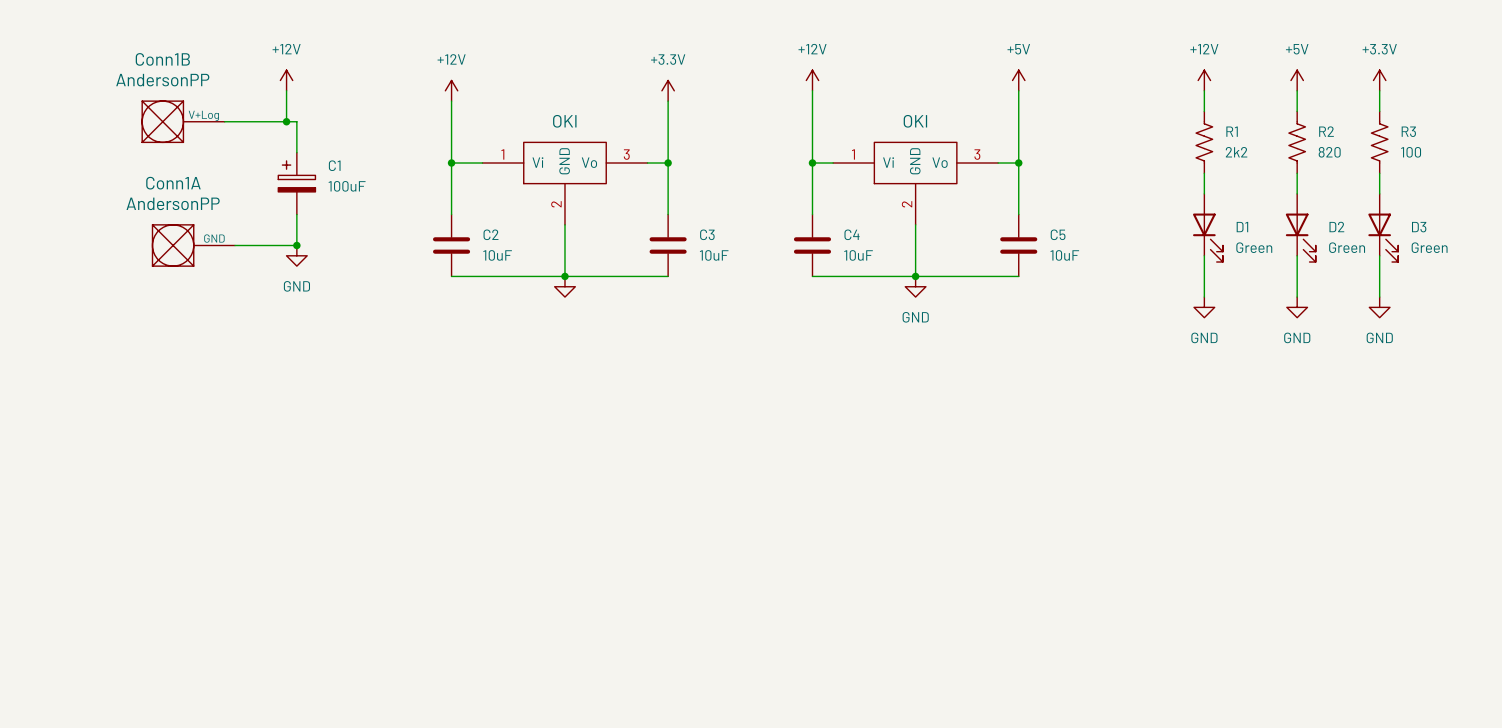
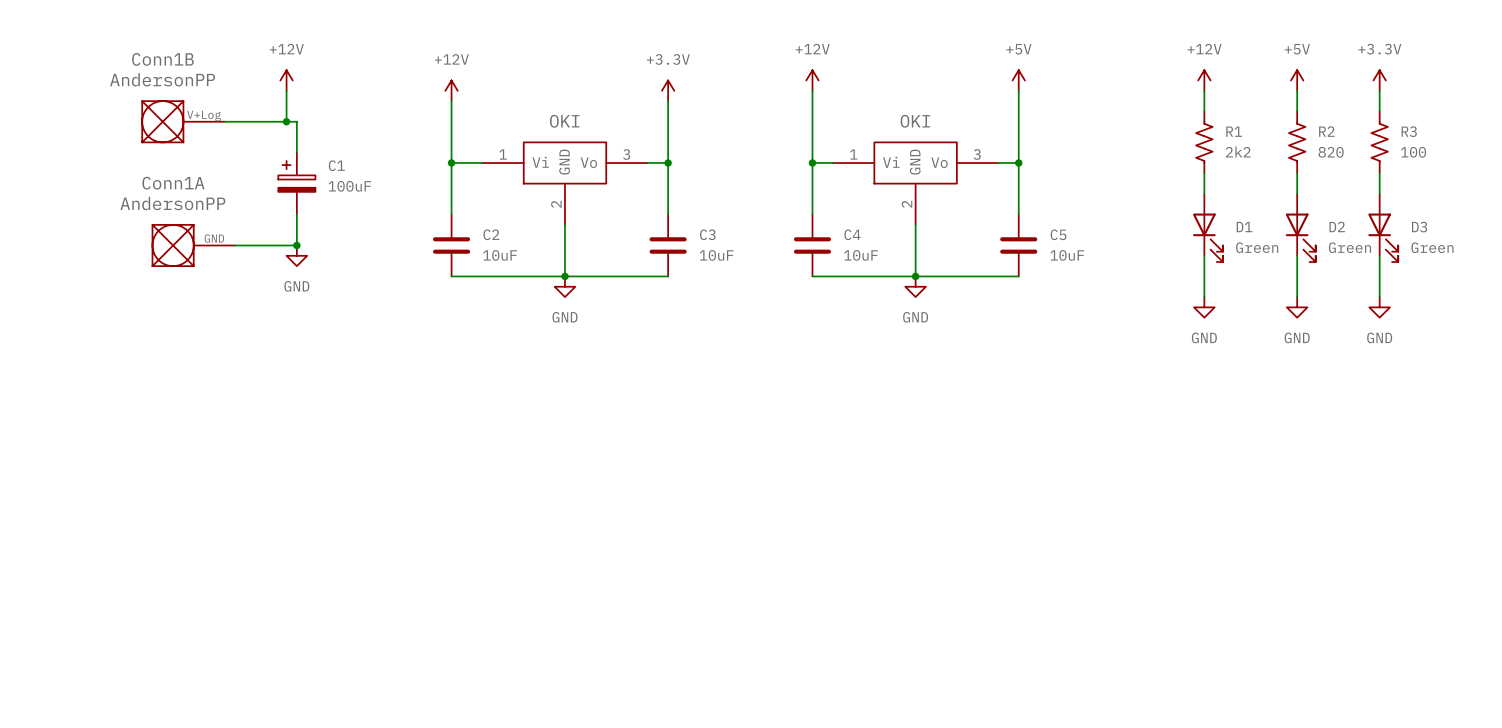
power symbol text: none -> GND (564, 317)

